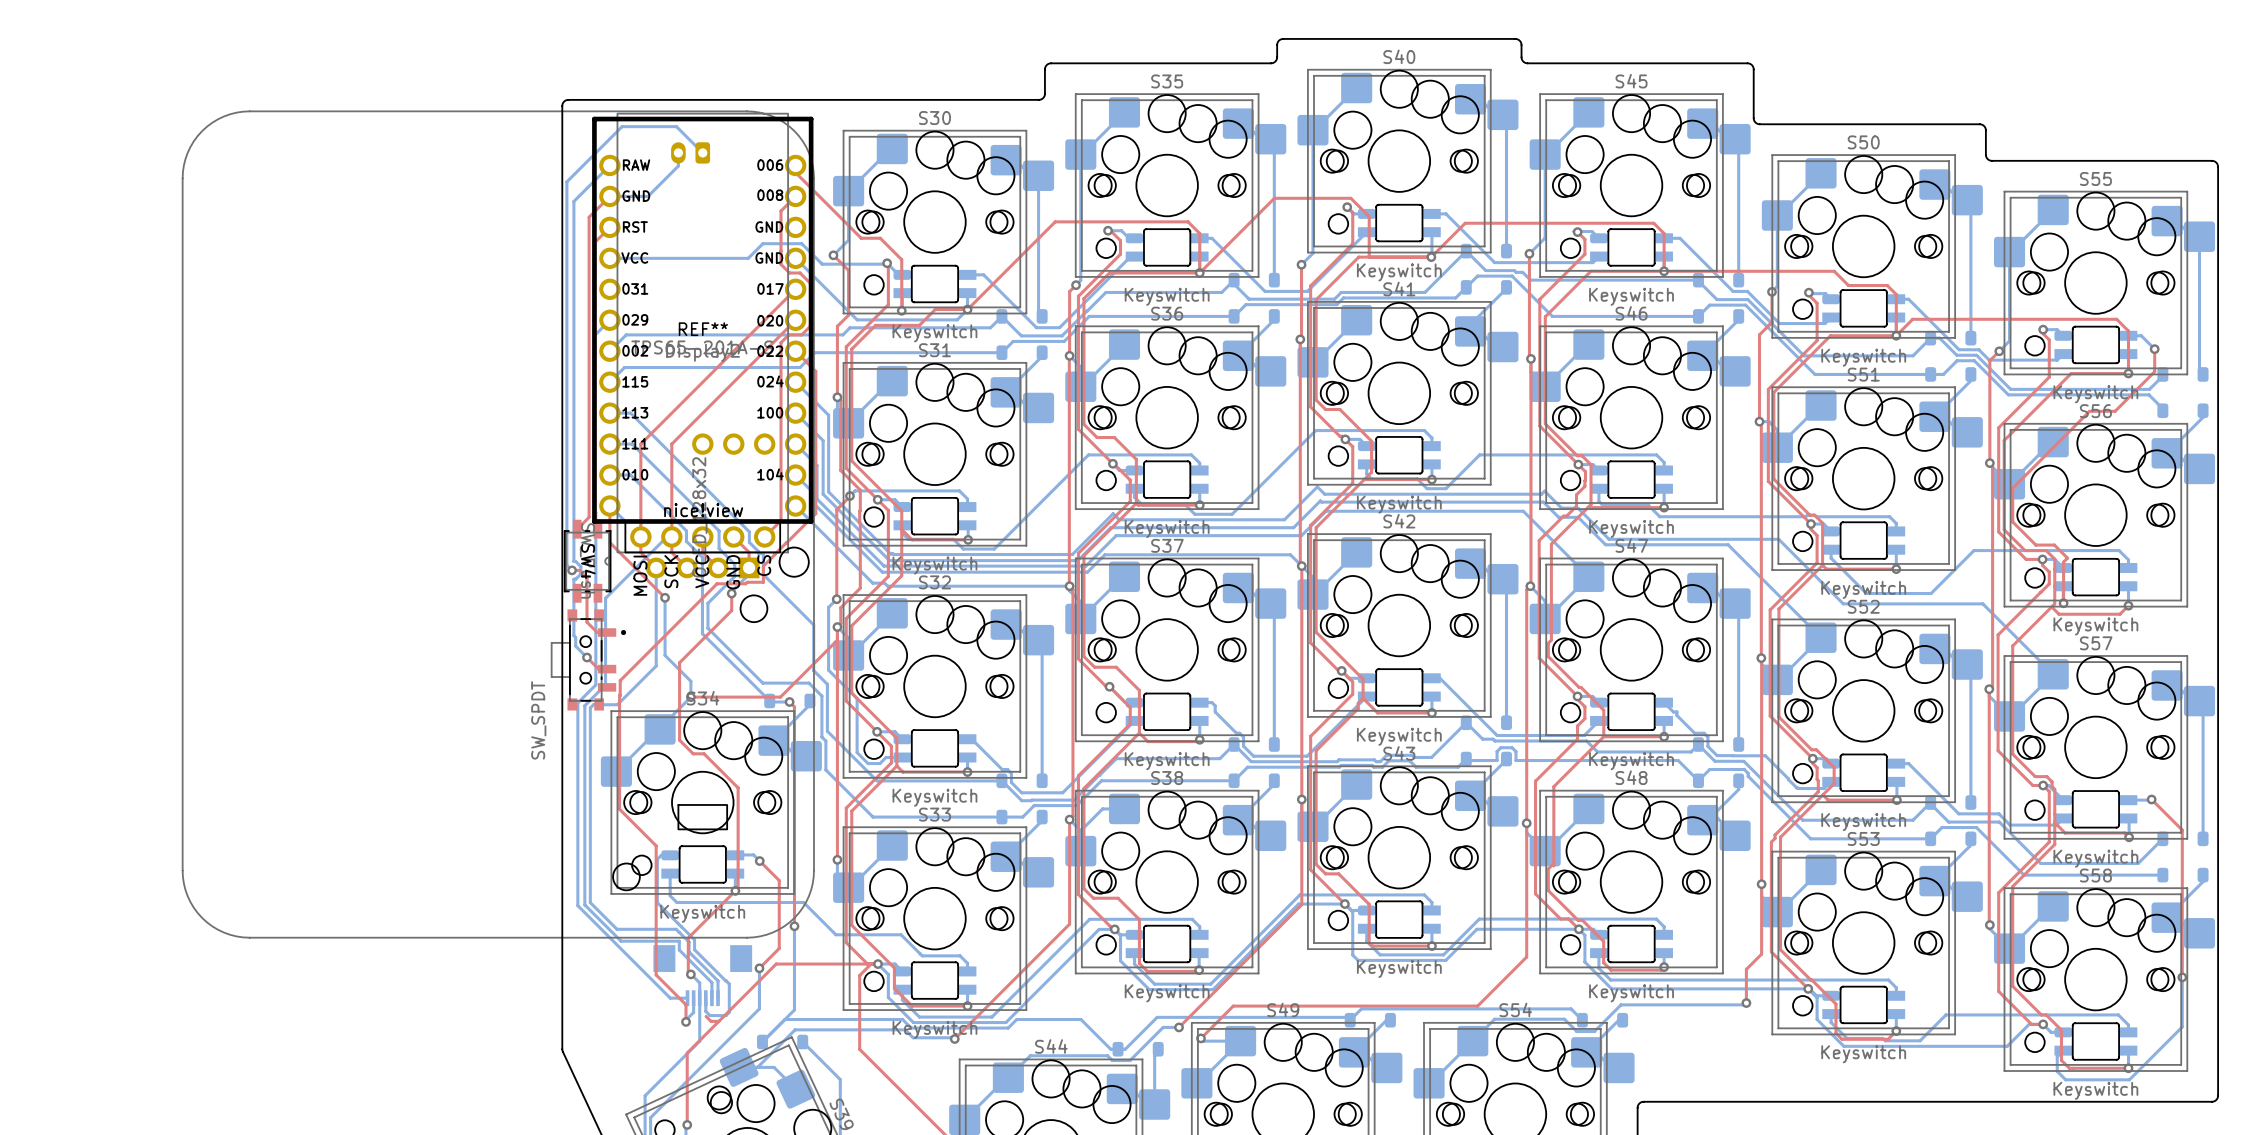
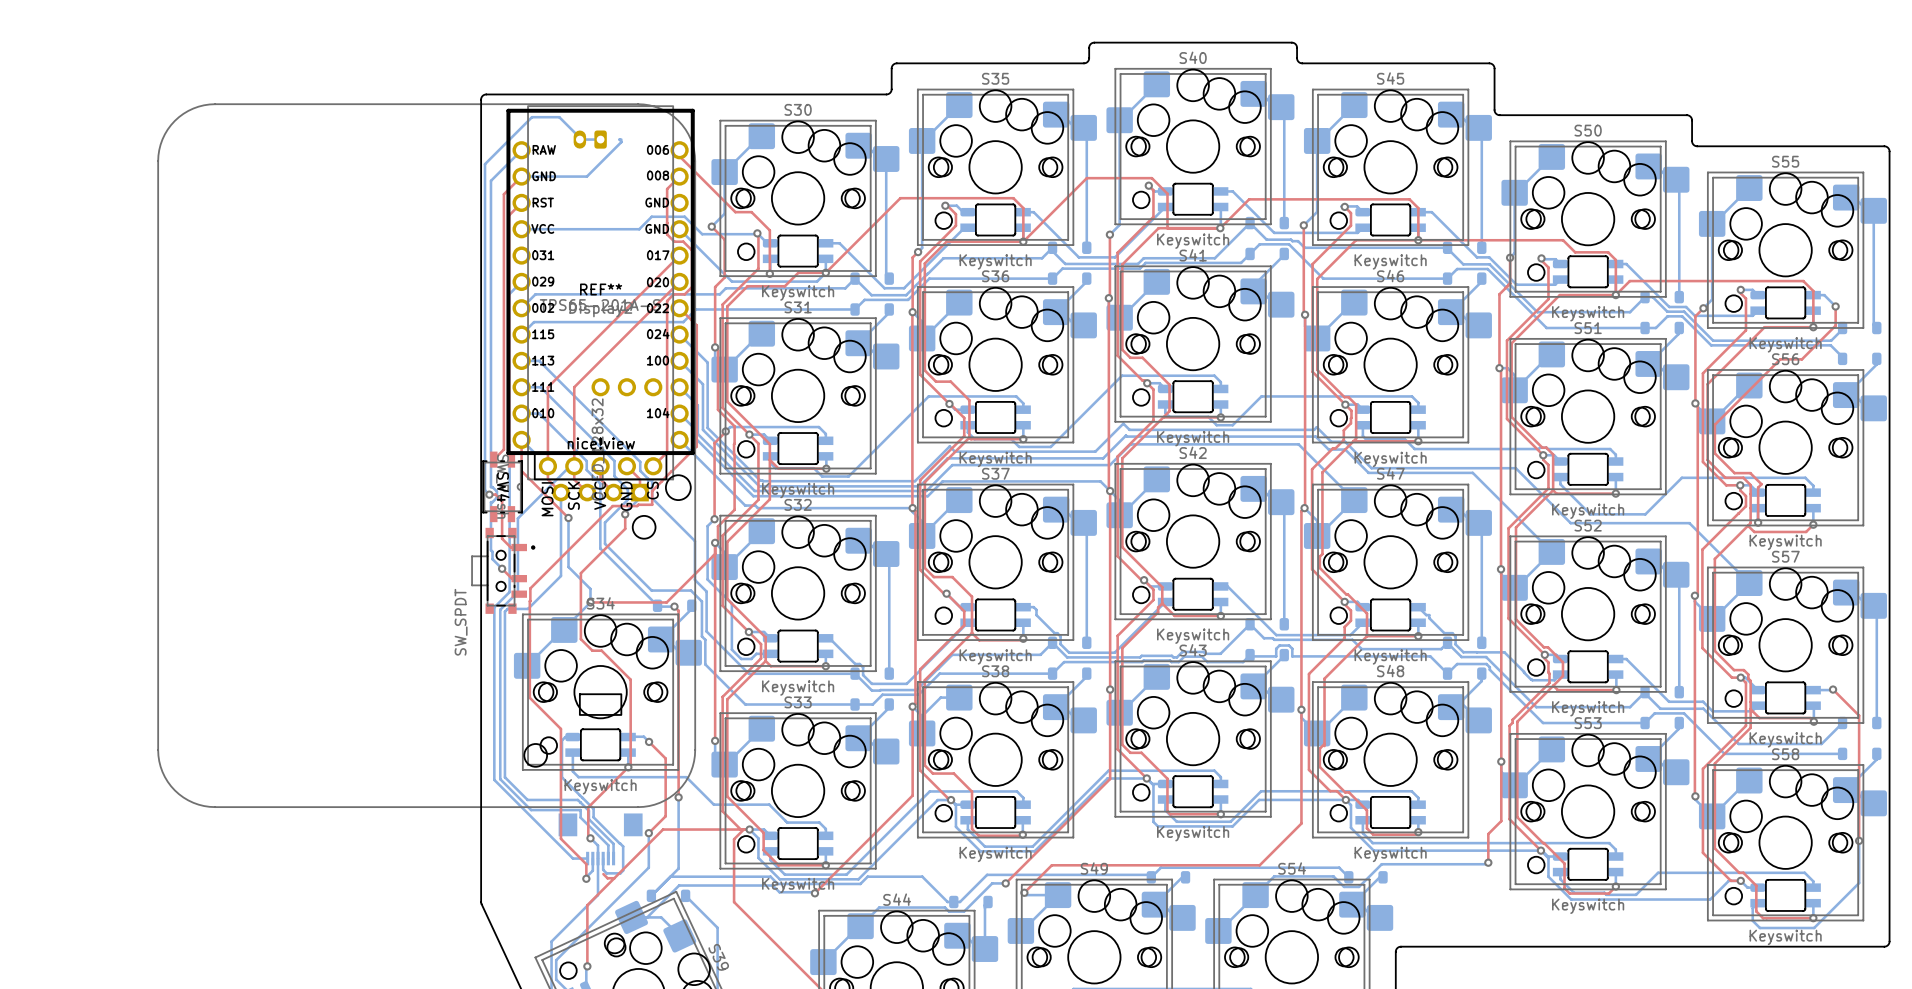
bottom track: (654, 126) (676, 126) (702, 152) -> (559, 117) (581, 139) (600, 139)
bottom track: (678, 152) (678, 166) (647, 196) -> (621, 139) (619, 139) (621, 142) (586, 176) (553, 176)

